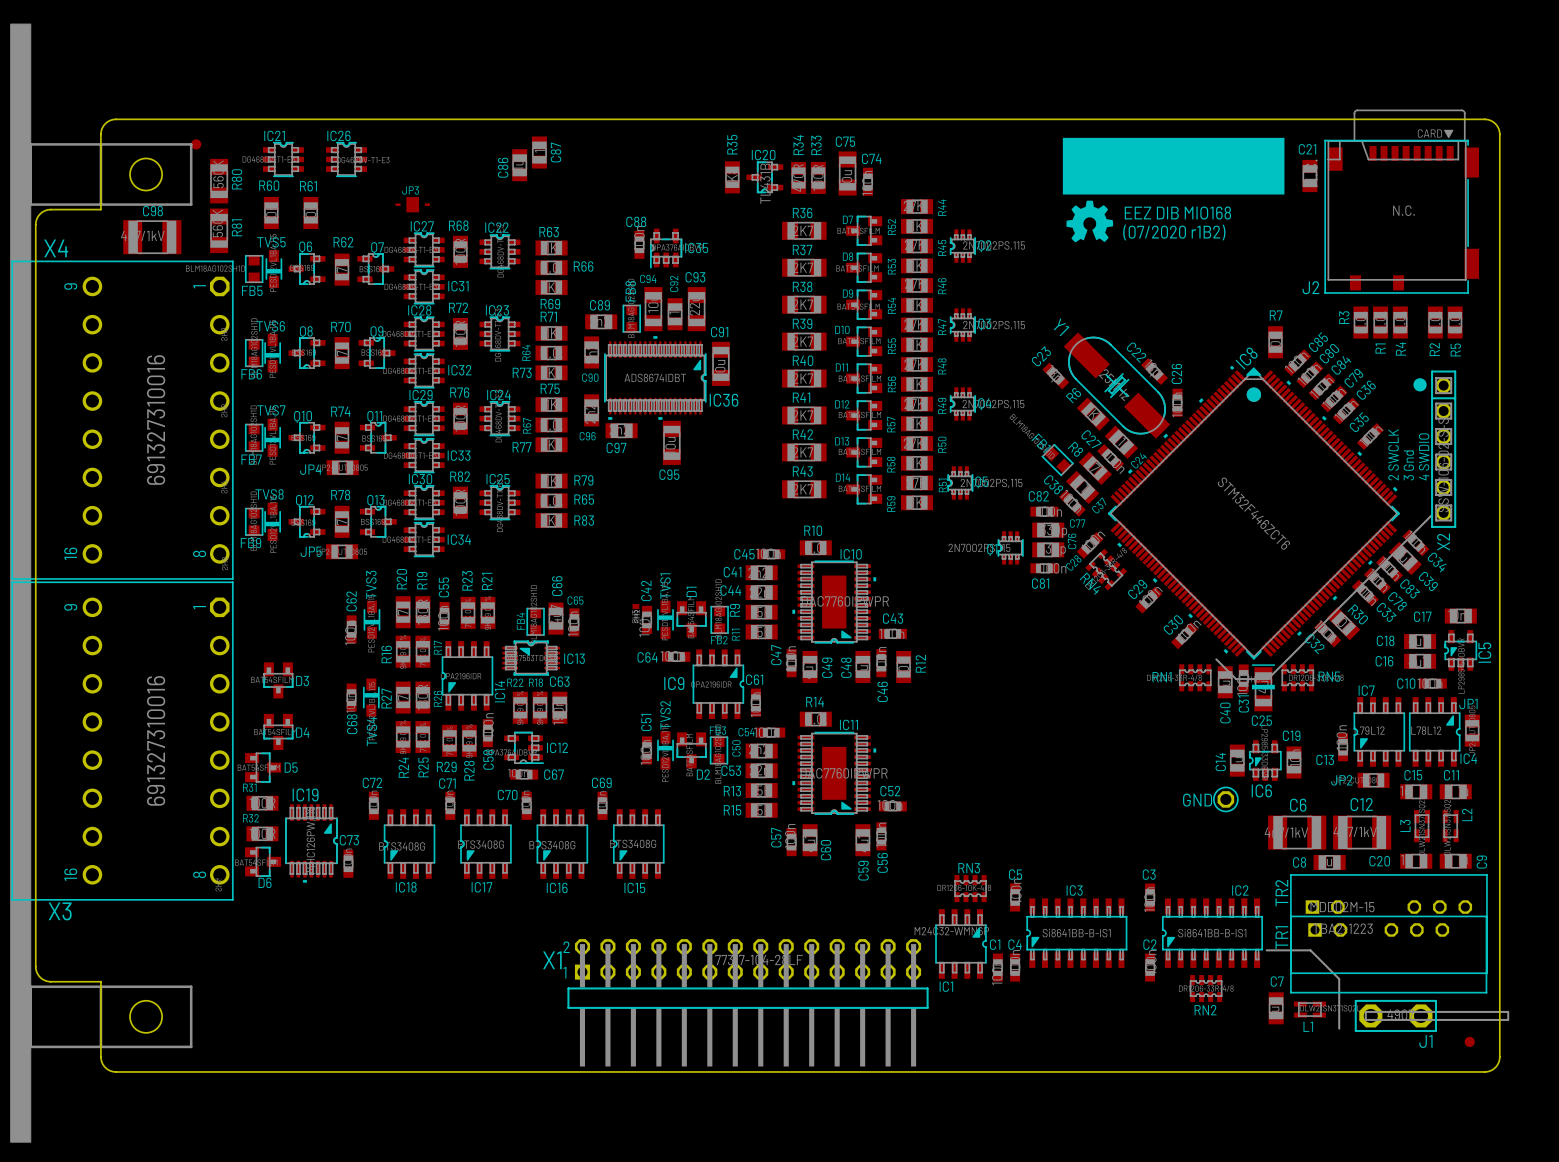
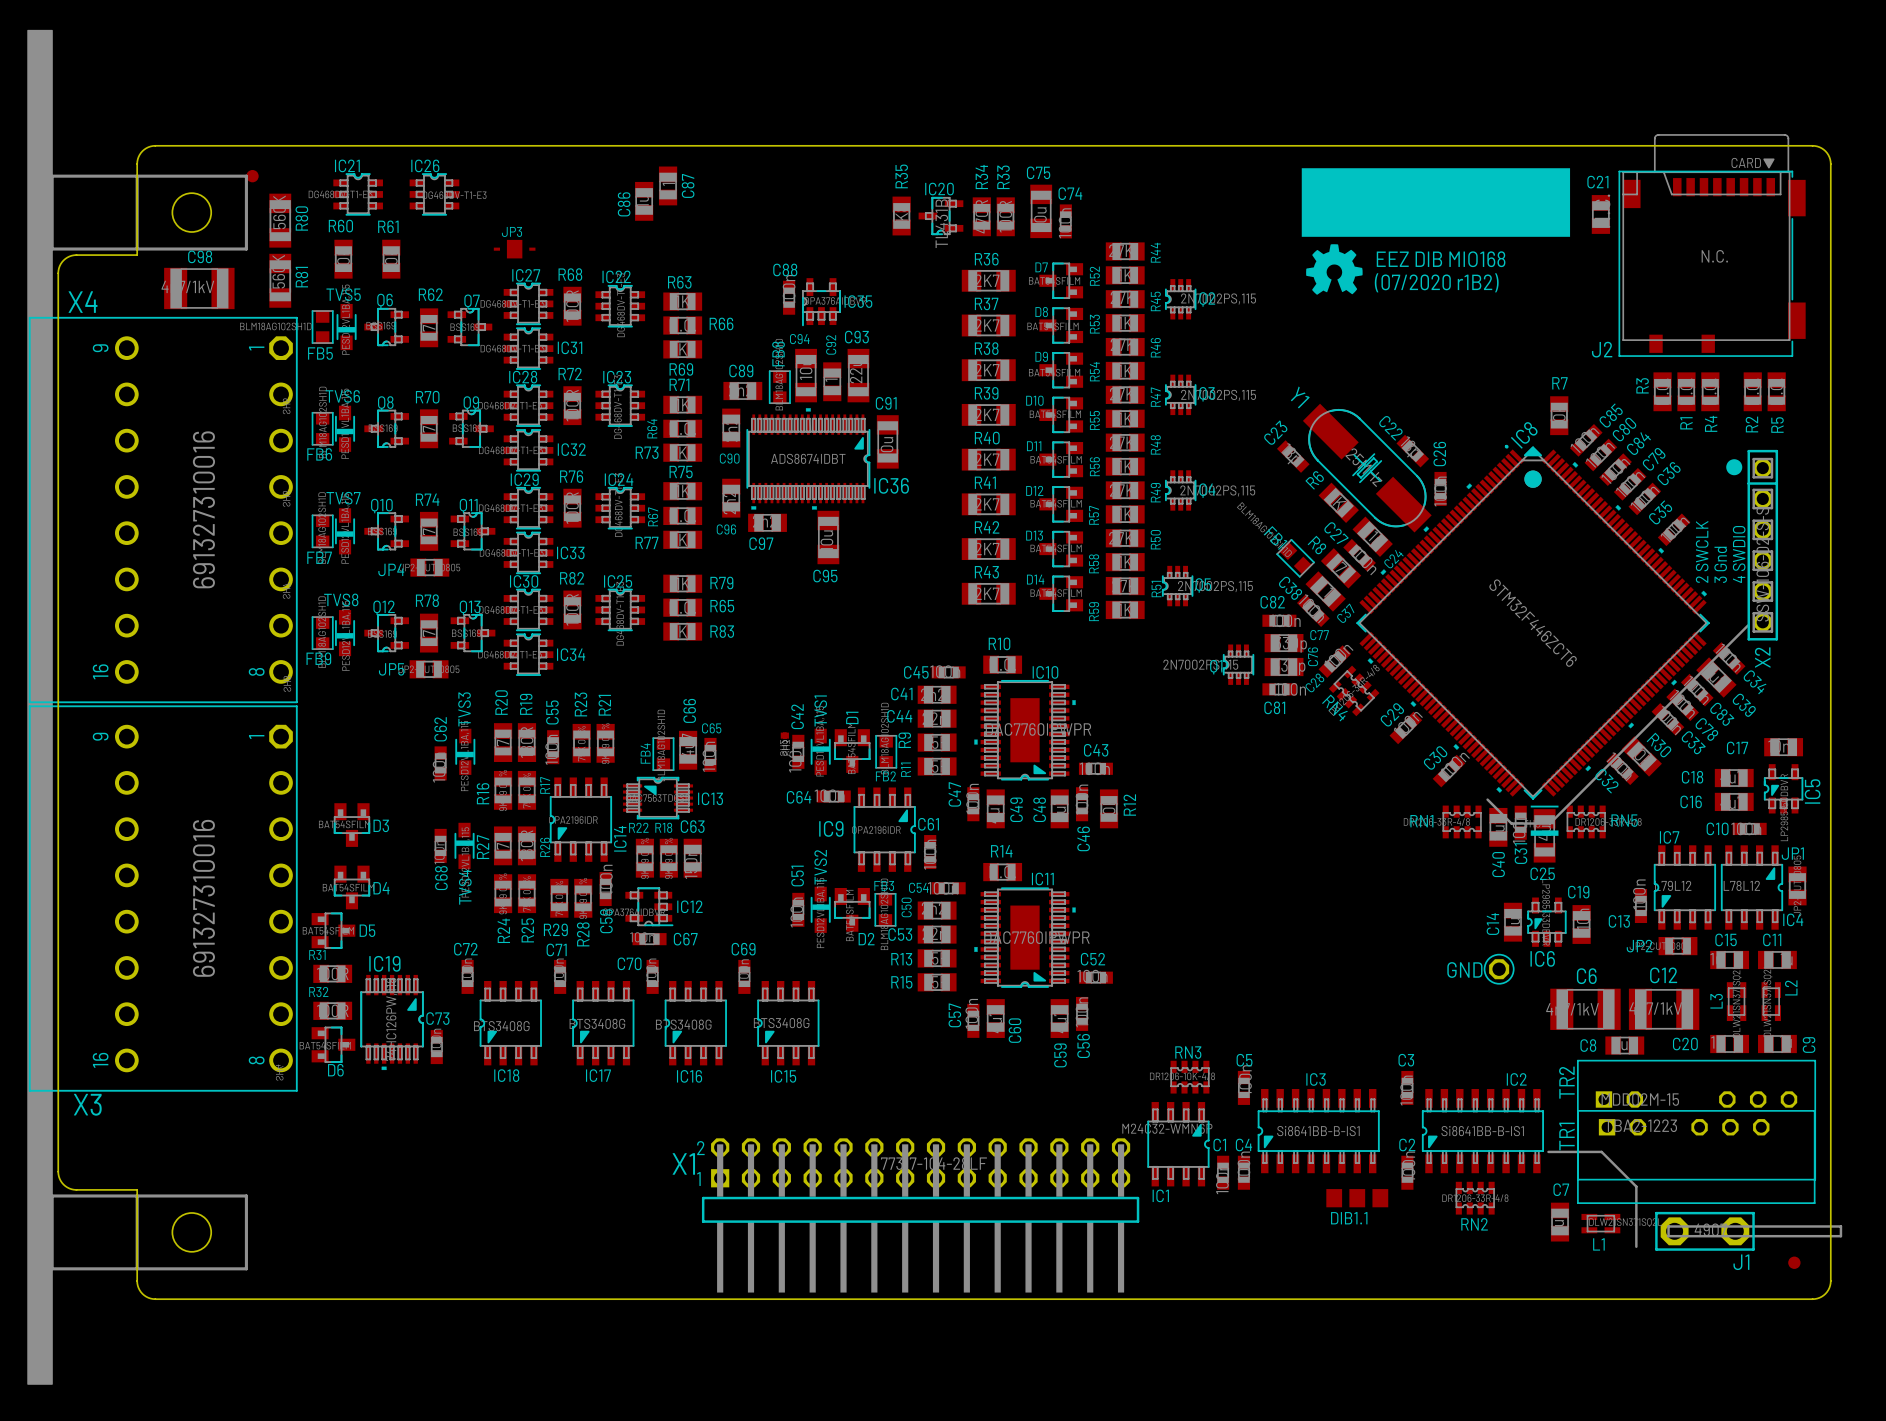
DIB1.1: none -> (1357, 1198)

